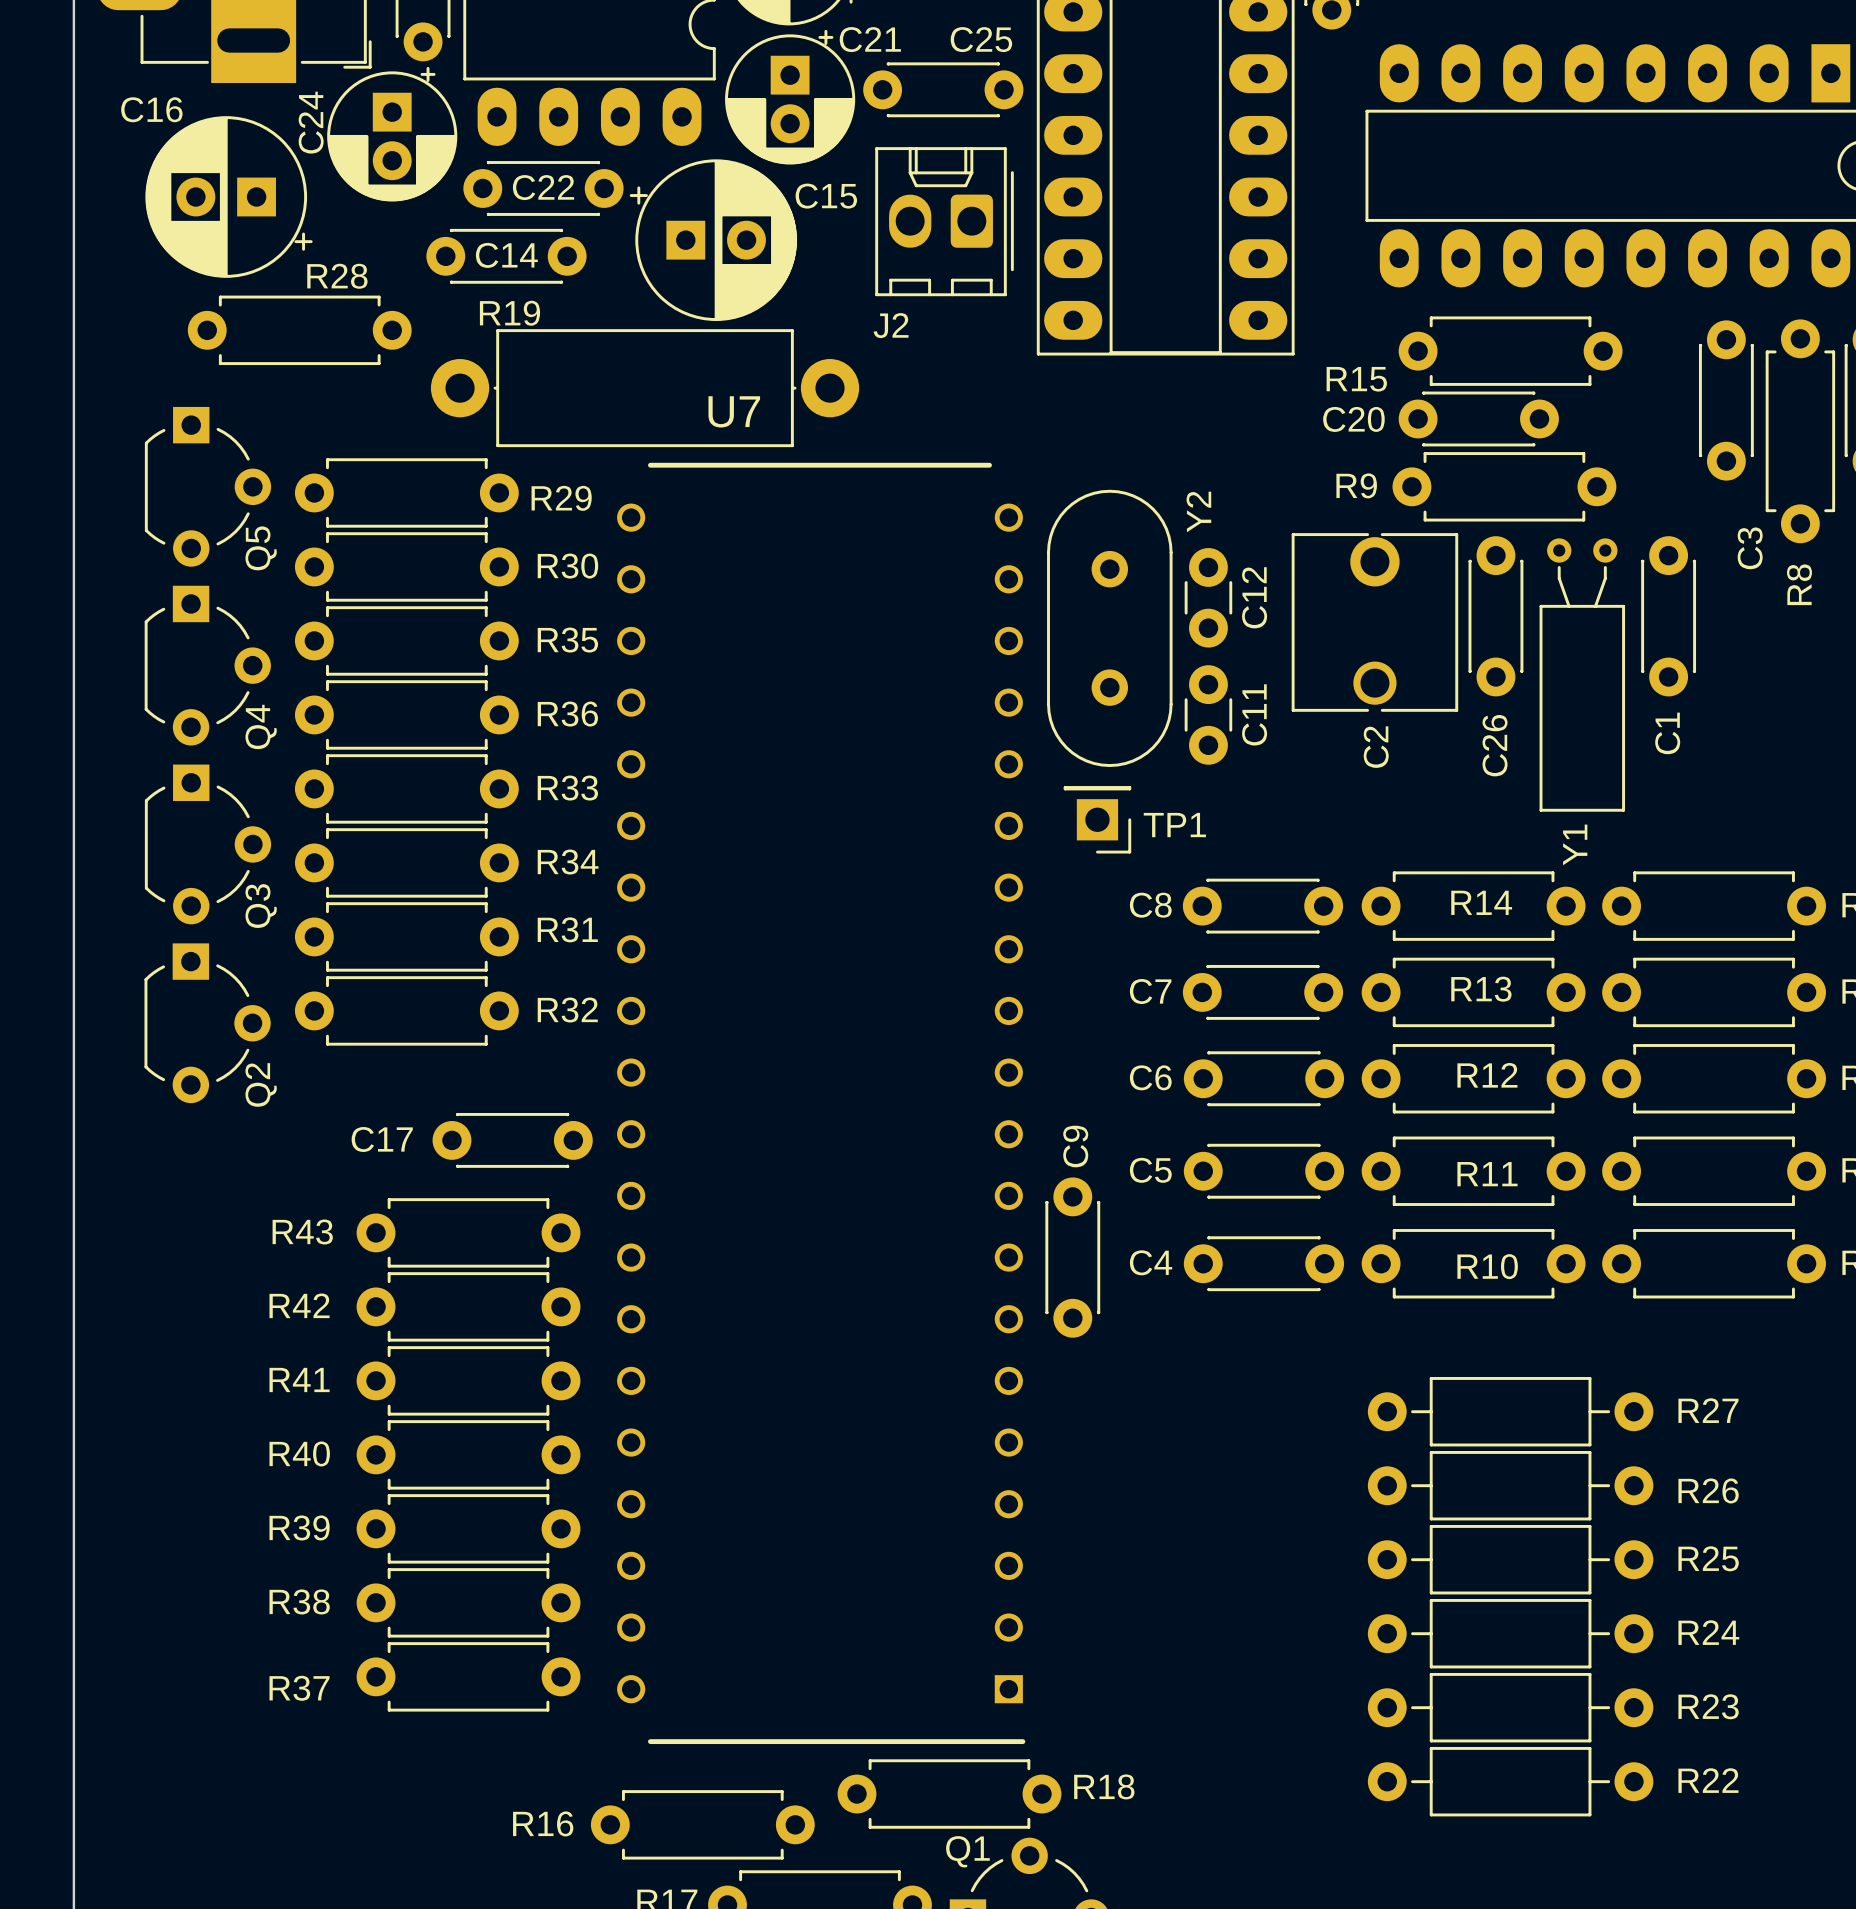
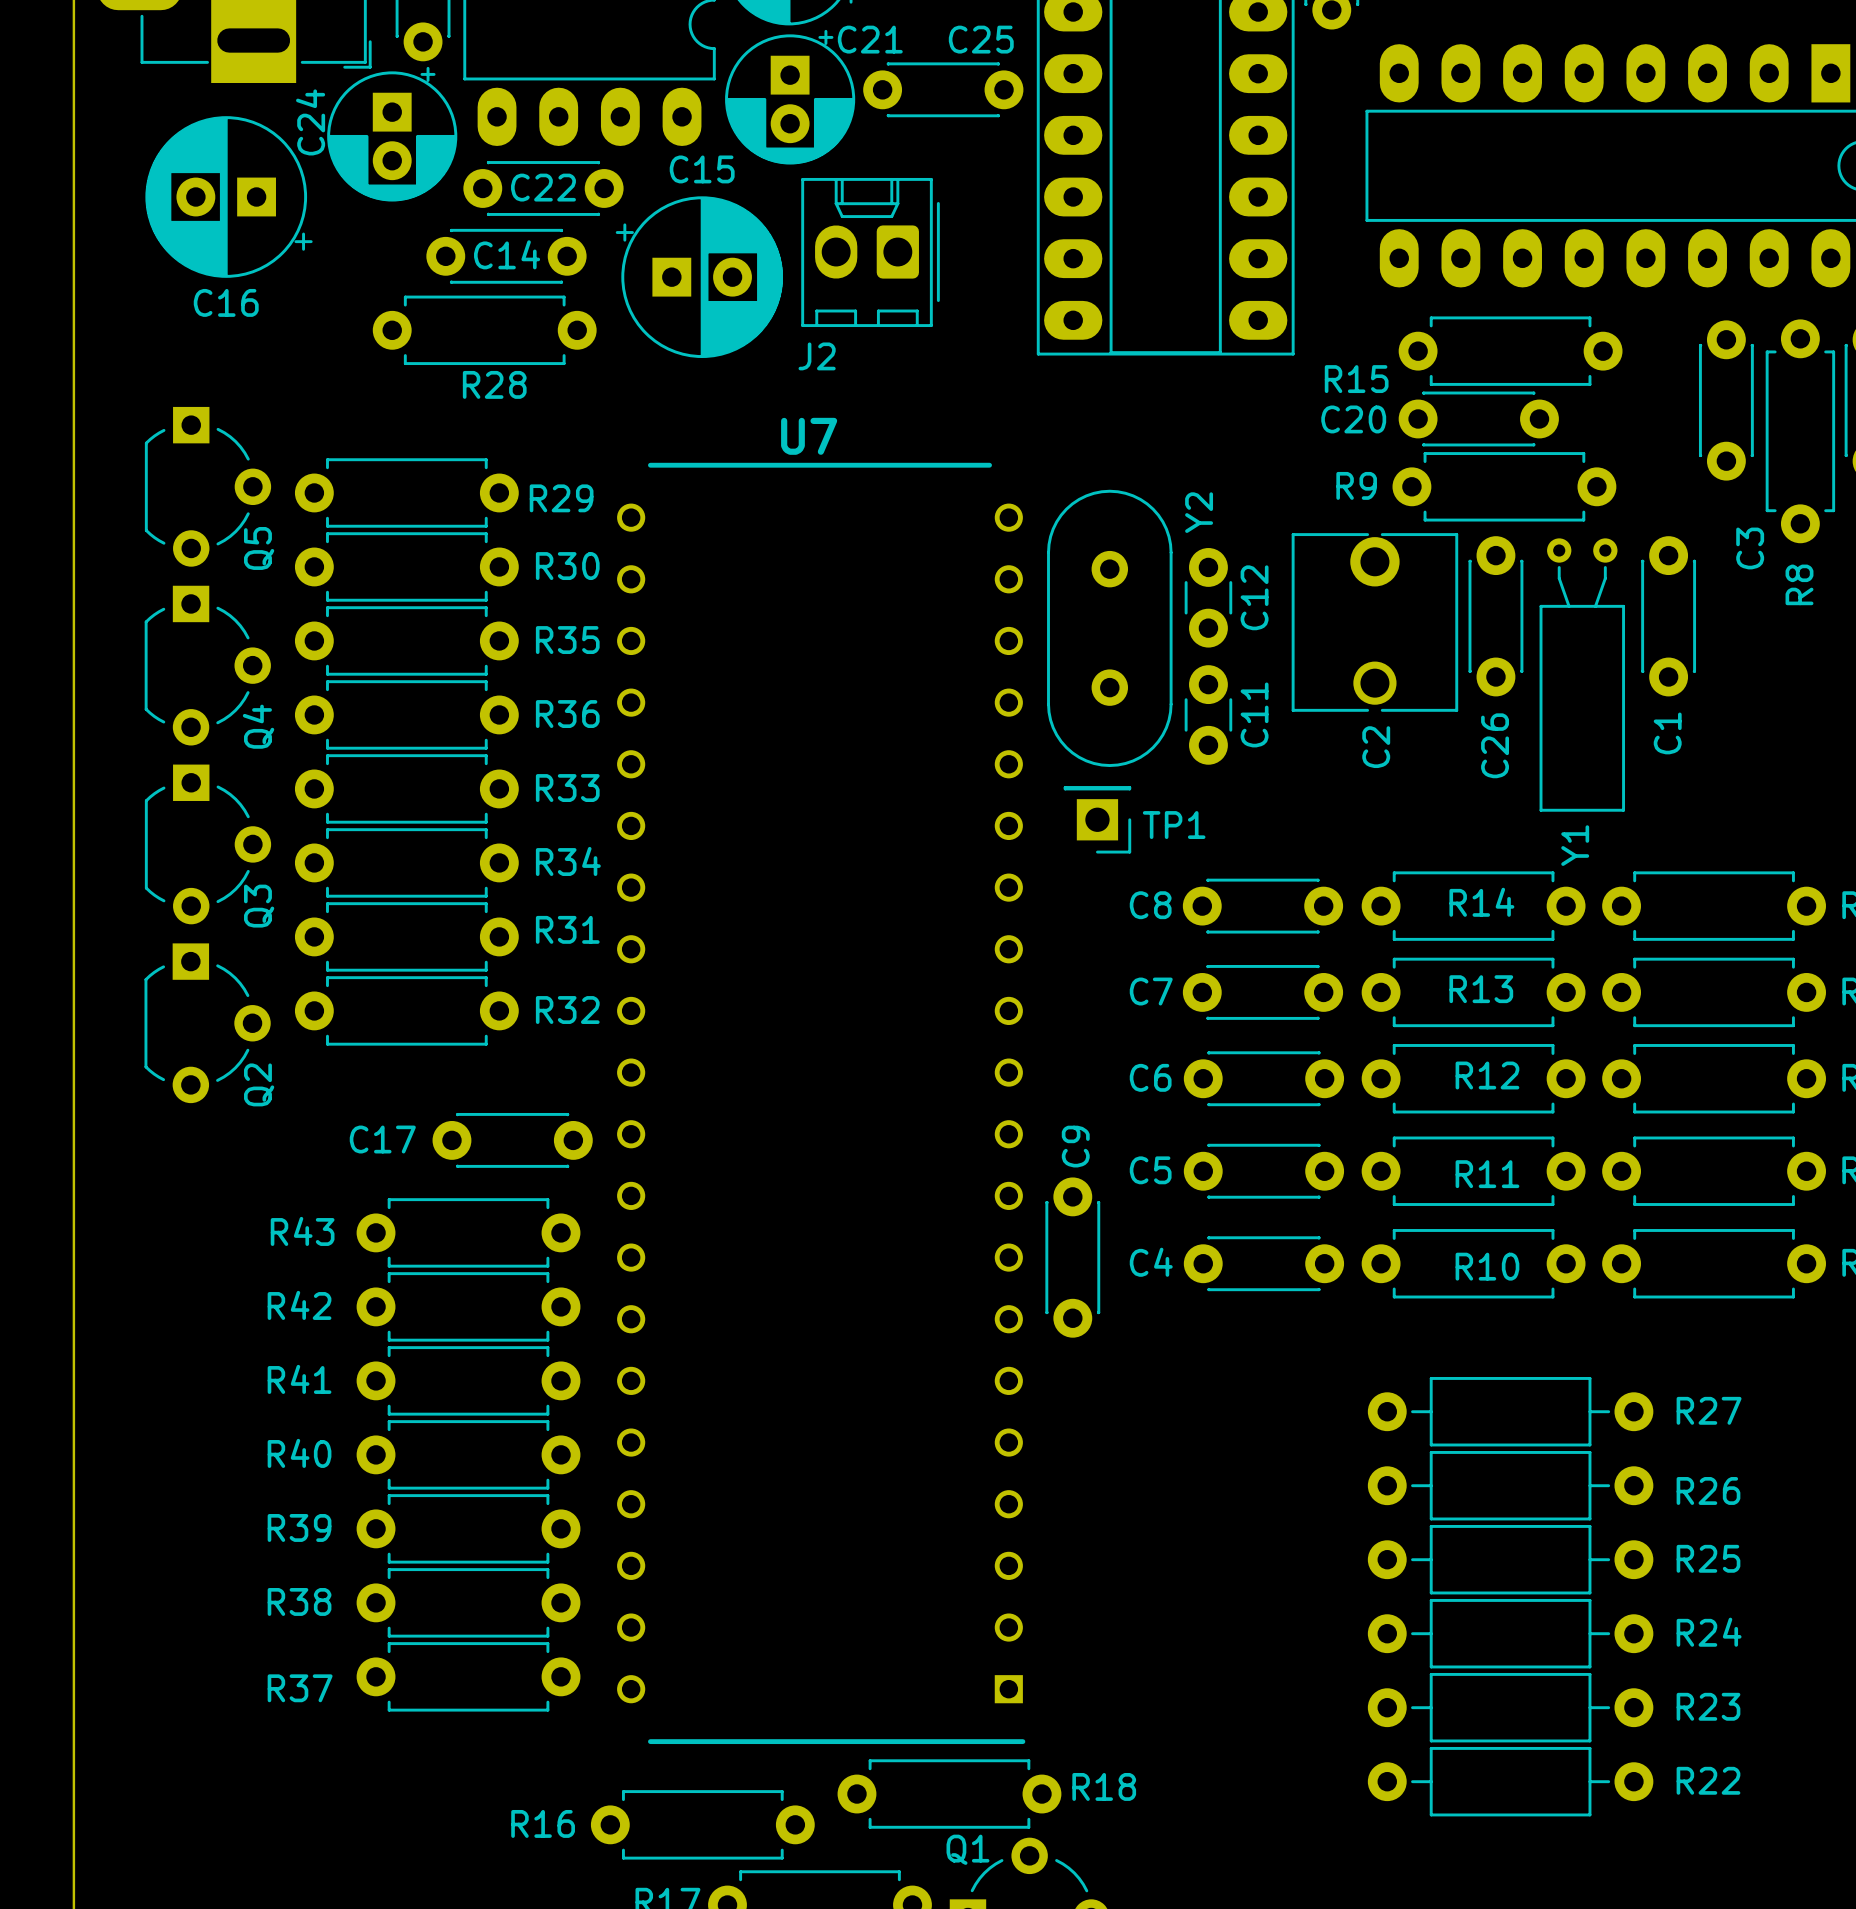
C16 name position: C16 (151, 109) -> C16 (226, 302)
C15 name position: C15 (826, 196) -> C15 (702, 169)
J2 position: (944, 221) -> (870, 252)
C15 position: (713, 240) -> (699, 277)
R28 name position: R28 (337, 276) -> R28 (494, 384)
R28 position: (299, 330) -> (484, 330)
R19: (645, 388) -> none
U7 name position: U7 (734, 411) -> U7 (809, 436)

